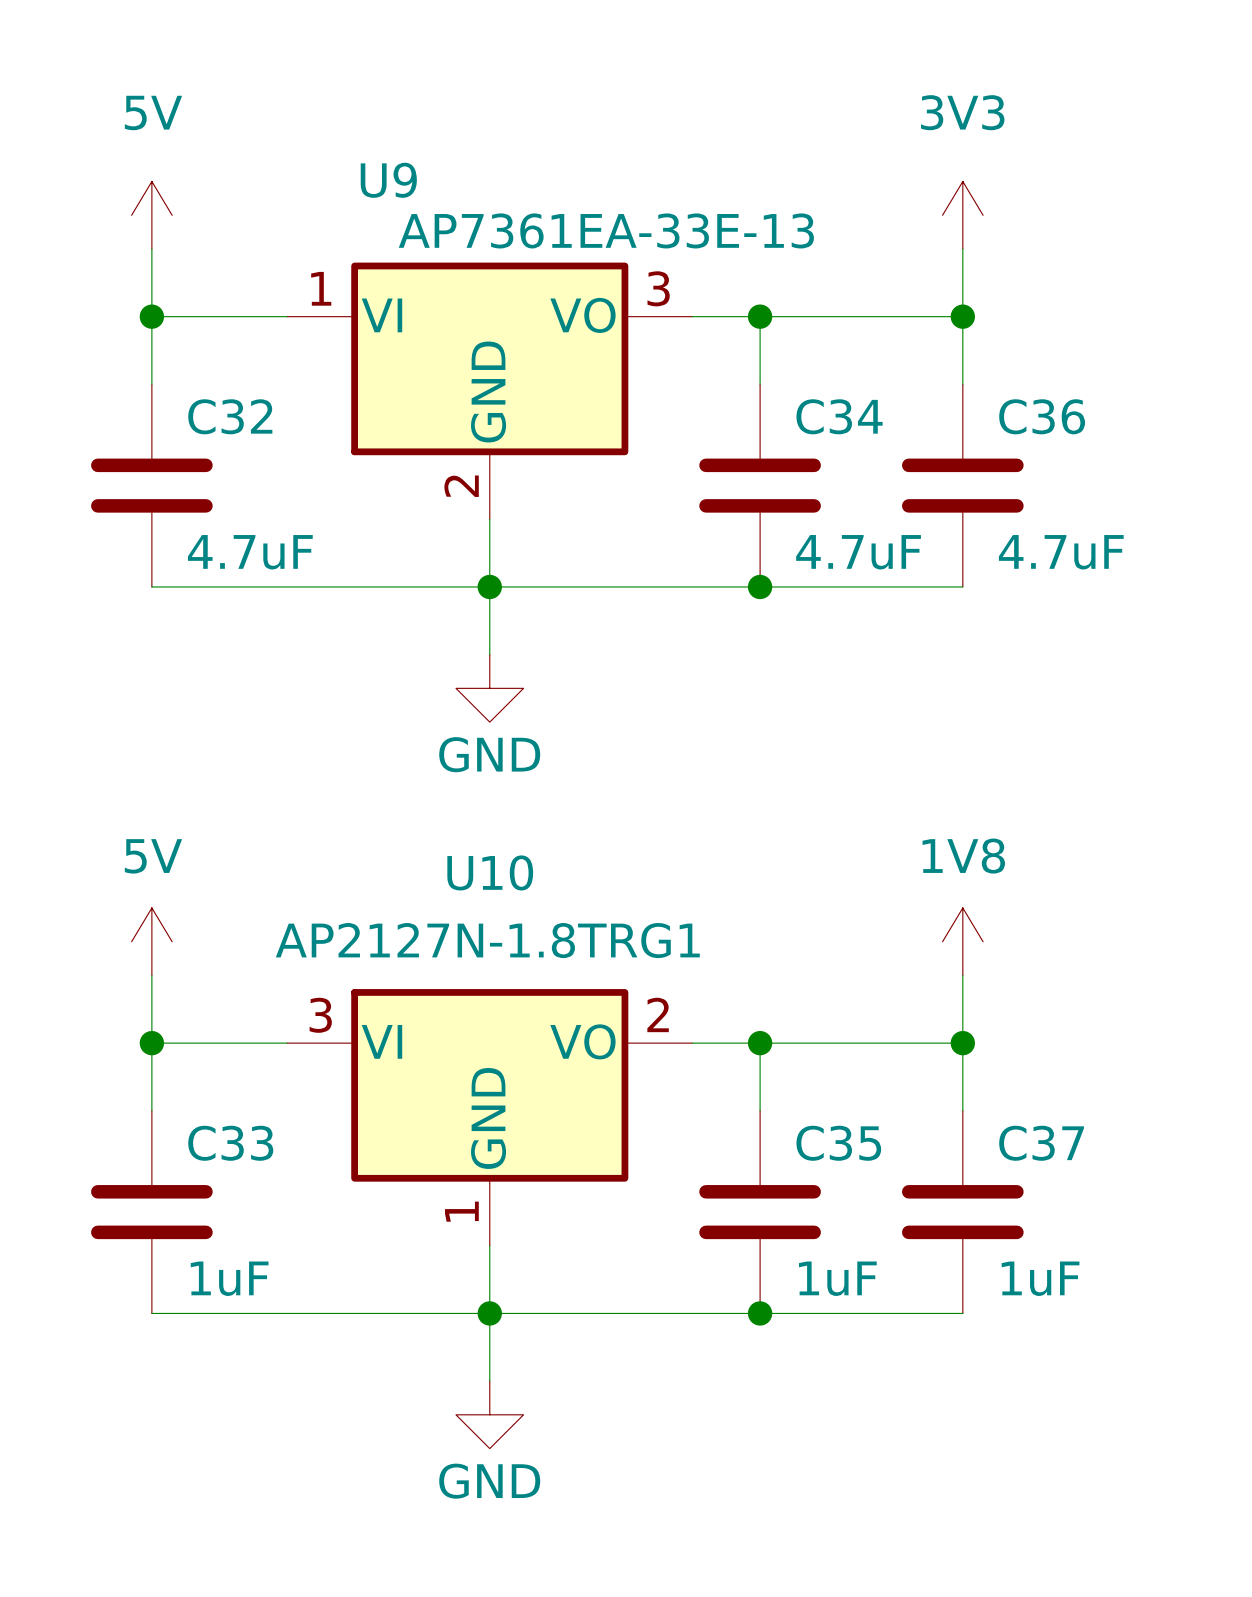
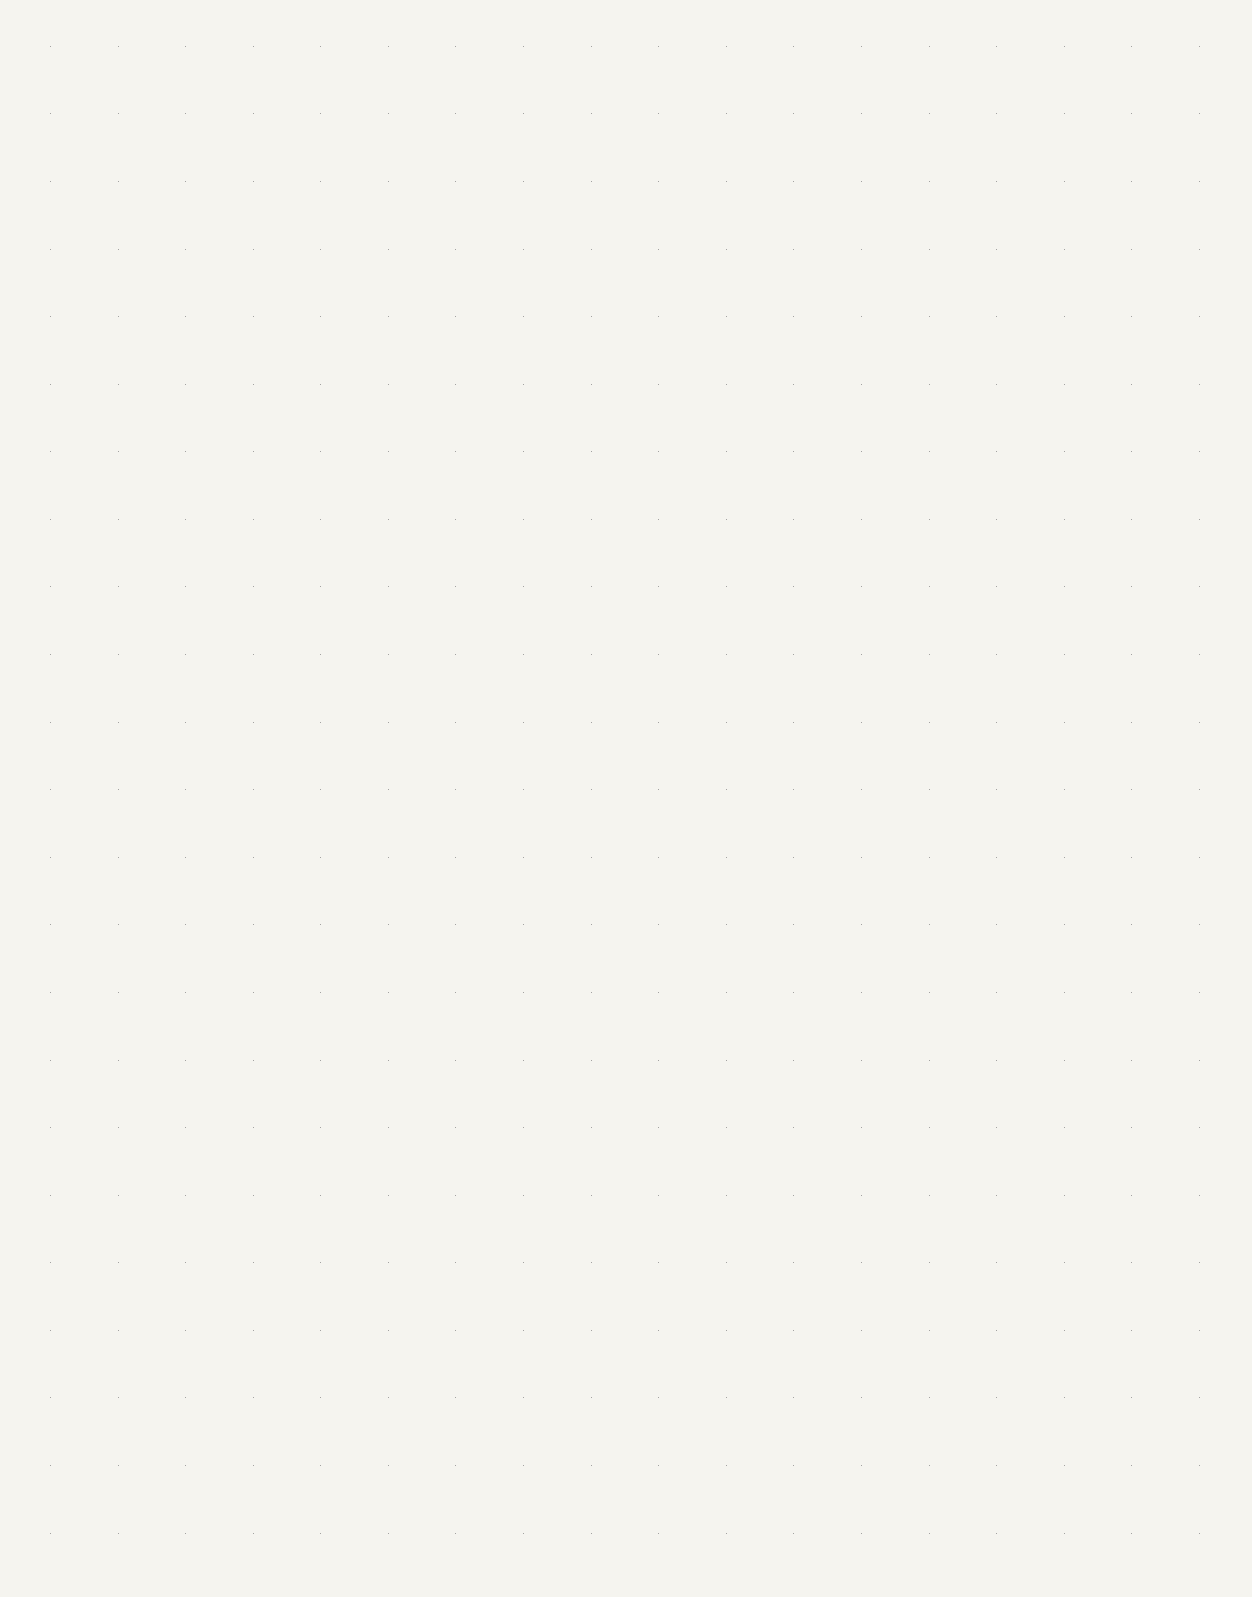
power symbol: 5V (151, 215) -> none
power symbol: 3V3 (962, 215) -> none
wire: (151, 249) (151, 384) -> none
wire: (962, 249) (962, 384) -> none
wire: (151, 316) (287, 316) -> none
junction: (151, 316) -> none
wire: (692, 316) (962, 316) -> none
wire: (760, 316) (760, 384) -> none
junction: (760, 316) -> none
junction: (962, 316) -> none
U9: AP7361EA-33E-13 (489, 391) -> none
C32: 4.7uF (151, 485) -> none
C34: 4.7uF (760, 485) -> none
C36: 4.7uF (962, 485) -> none
wire: (489, 519) (489, 654) -> none
wire: (151, 586) (962, 586) -> none
junction: (489, 586) -> none
junction: (760, 586) -> none
power symbol: GND (489, 688) -> none
power symbol: 5V (151, 941) -> none
power symbol: 1V8 (962, 941) -> none
wire: (151, 975) (151, 1110) -> none
wire: (962, 975) (962, 1110) -> none
wire: (151, 1043) (287, 1043) -> none
junction: (151, 1043) -> none
wire: (692, 1043) (962, 1043) -> none
wire: (760, 1043) (760, 1110) -> none
junction: (760, 1043) -> none
junction: (962, 1043) -> none
U10: AP2127N-1.8TRG1 (489, 1117) -> none
C33: 1uF (151, 1212) -> none
C35: 1uF (760, 1212) -> none
C37: 1uF (962, 1212) -> none
wire: (489, 1245) (489, 1381) -> none
wire: (151, 1313) (962, 1313) -> none
junction: (489, 1313) -> none
junction: (760, 1313) -> none
power symbol: GND (489, 1414) -> none

